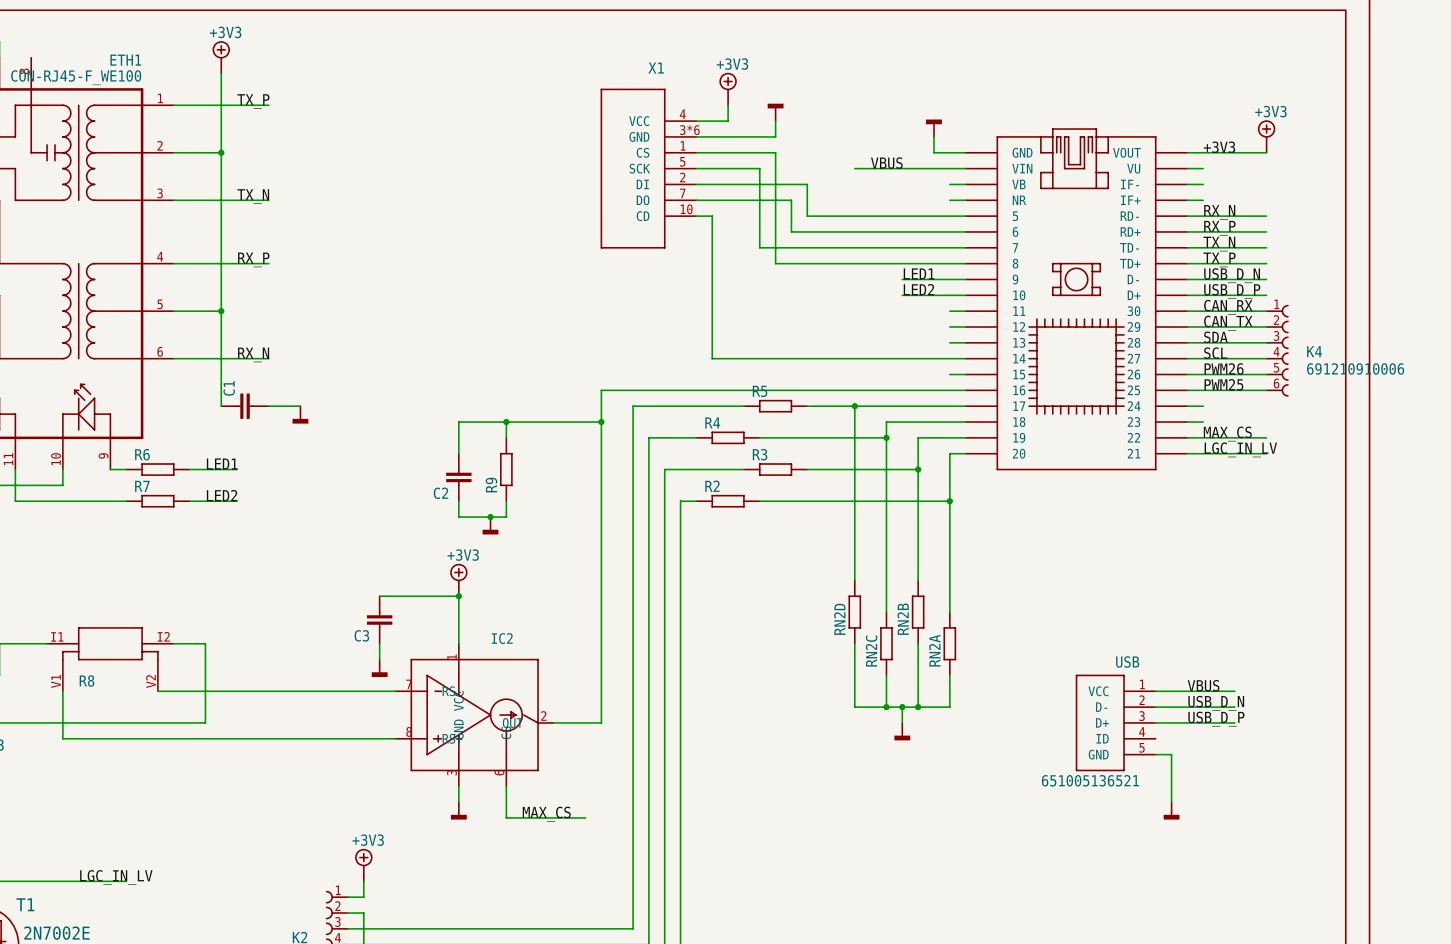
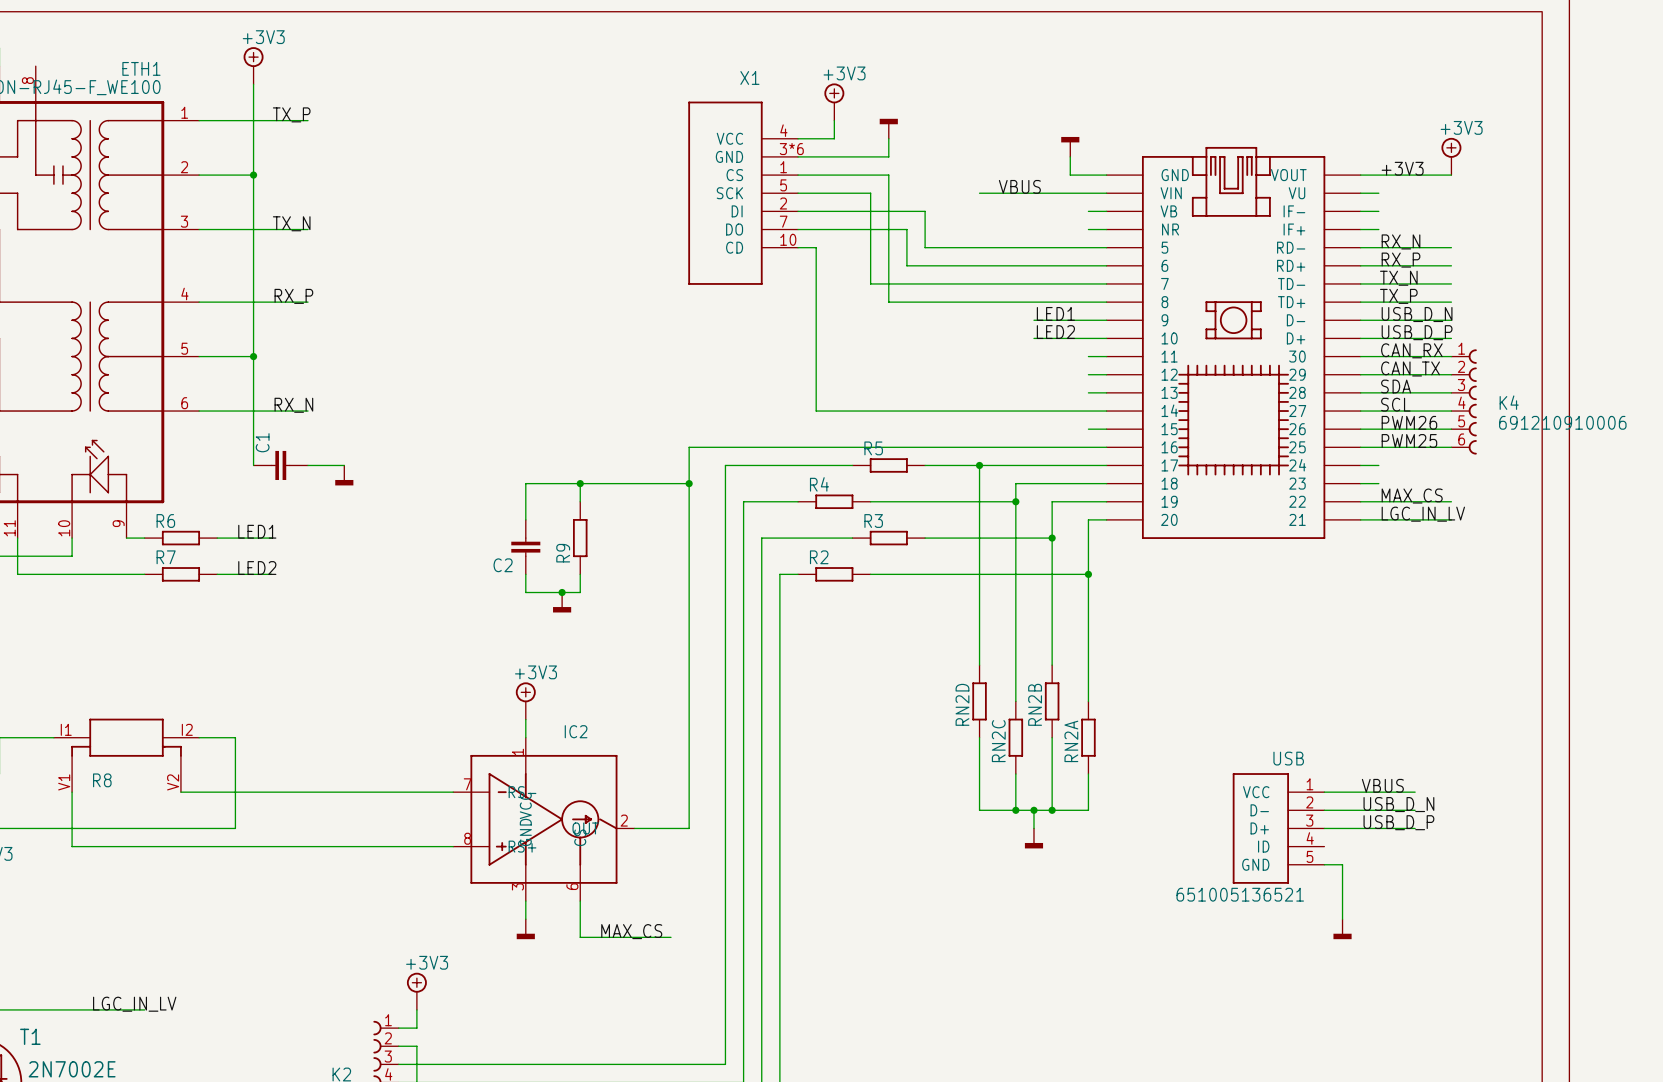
power symbol position: +3V3 (458, 580) -> +3V3 (525, 700)
wire: (379, 596) (458, 596) (458, 627) -> none
junction: (458, 596) -> none
C3: (379, 620) -> none
wire: (379, 643) (379, 659) -> none
power symbol: (379, 668) -> none

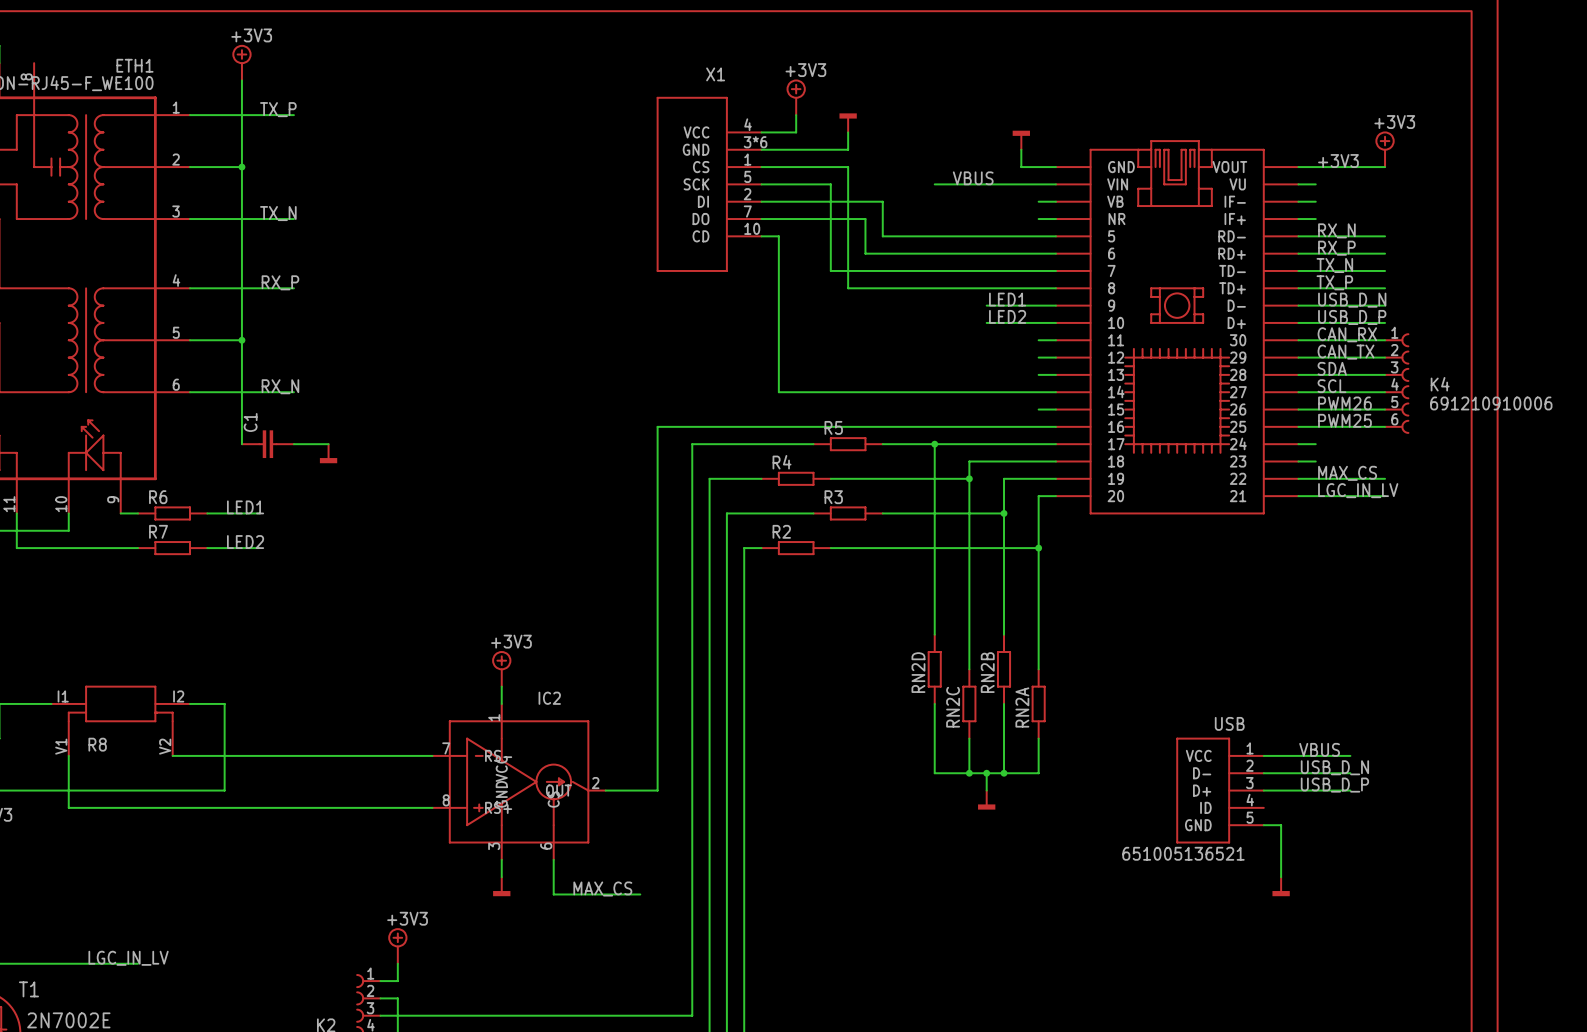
wire: (580, 483) (580, 501) -> none
junction: (580, 483) -> none
wire: (689, 483) (525, 483) (525, 519) -> none
junction: (689, 483) -> none
R9: (580, 538) -> none
C2: (525, 547) -> none
wire: (525, 574) (525, 592) (580, 592) (580, 574) -> none
junction: (562, 592) -> none
power symbol: (562, 602) -> none

